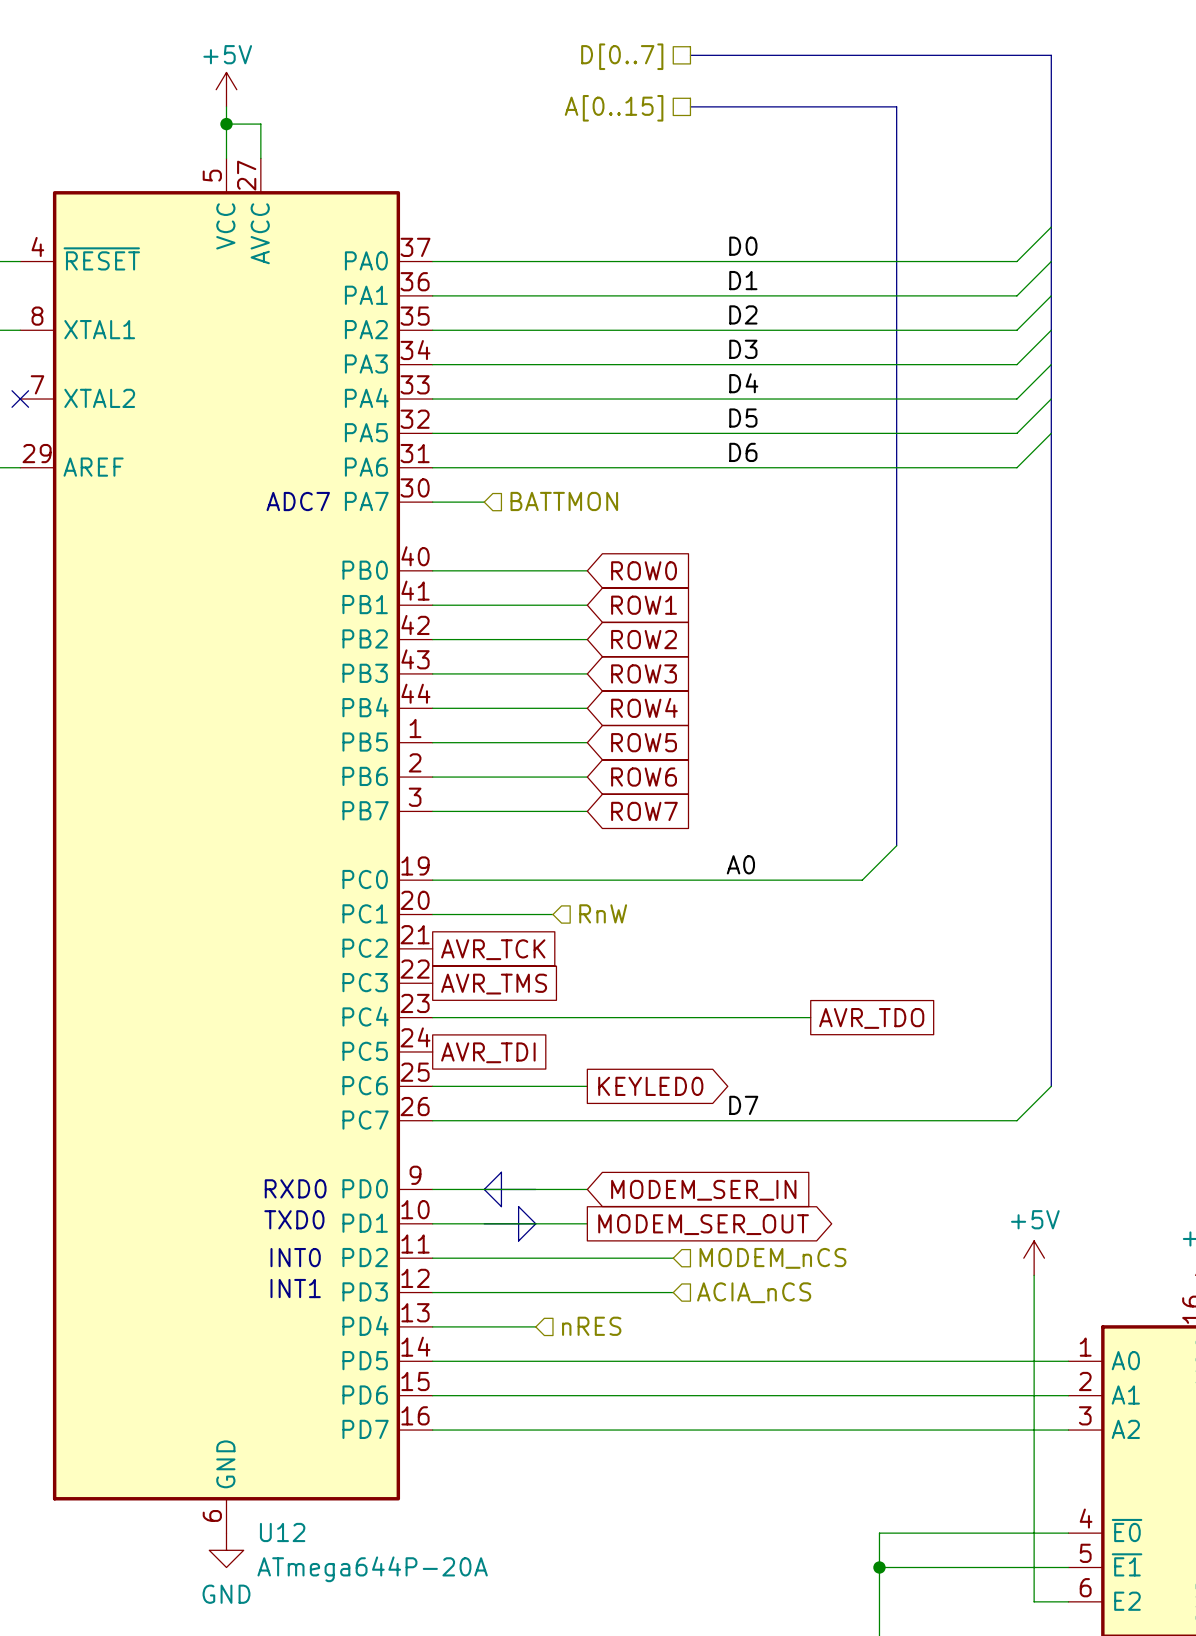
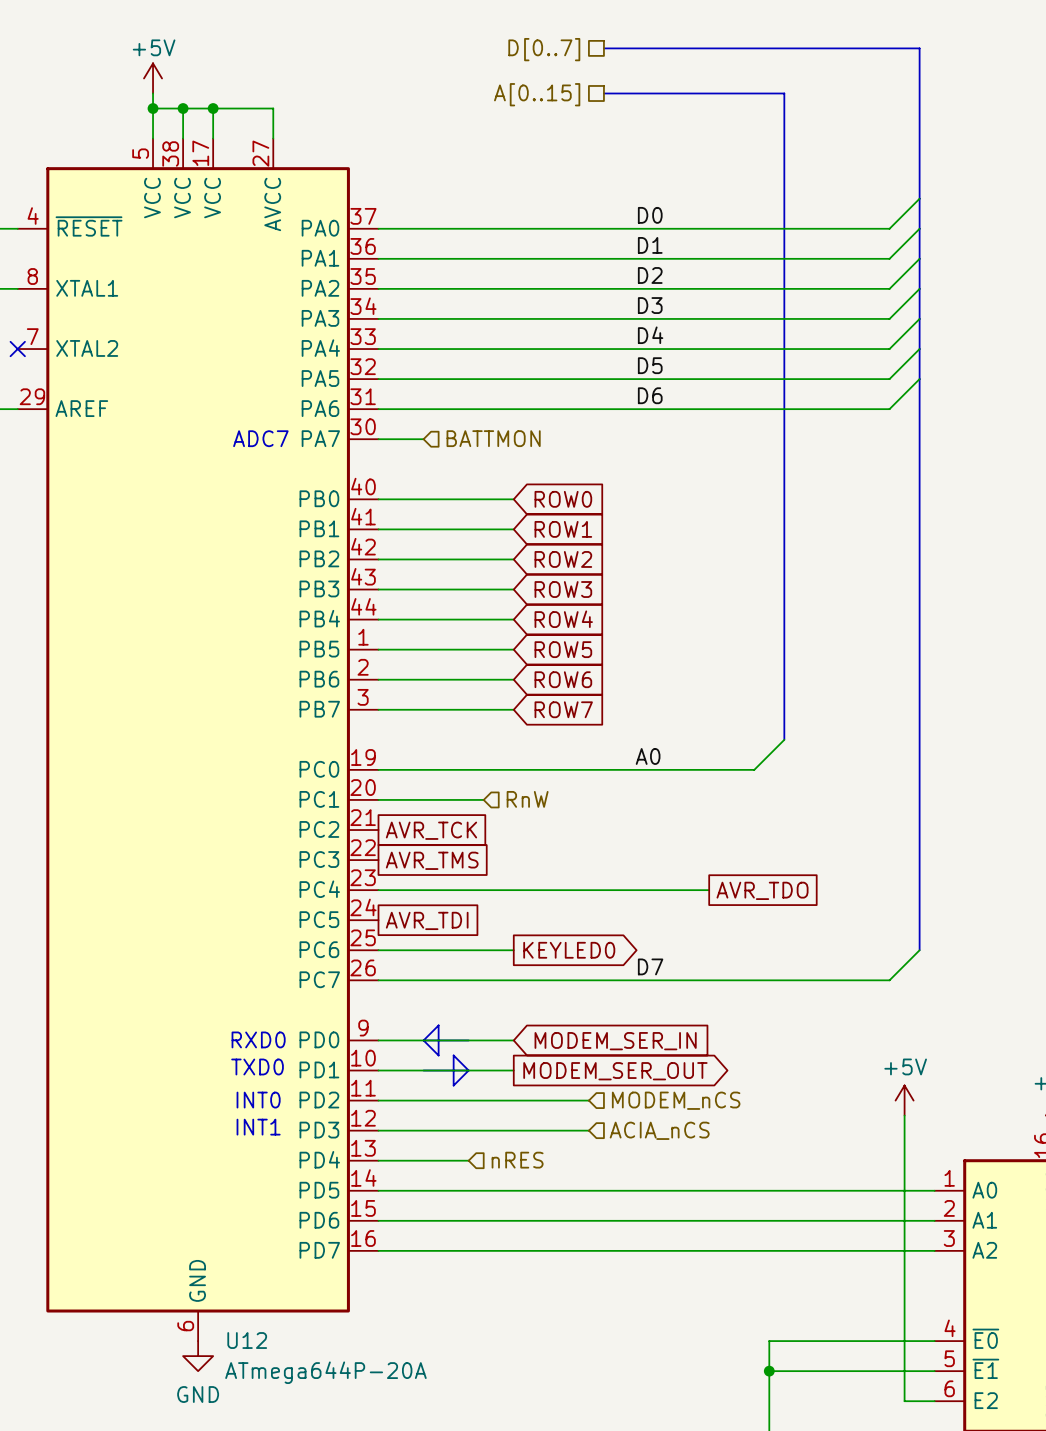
power symbol position: +5V (226, 89) -> +5V (153, 78)
wire: (226, 106) (226, 158) -> (153, 93) (153, 138)
wire: none -> (153, 108) (198, 108)
junction: none -> (153, 108)
wire: none -> (183, 108) (183, 138)
junction: none -> (183, 108)
junction: (226, 124) -> none
wire: none -> (213, 108) (213, 138)
junction: none -> (213, 108)
wire: (260, 124) (260, 158) -> (228, 108) (273, 108) (273, 138)
U12 symbol: [20, 158, 433, 1534] -> [17, 138, 379, 1342]

